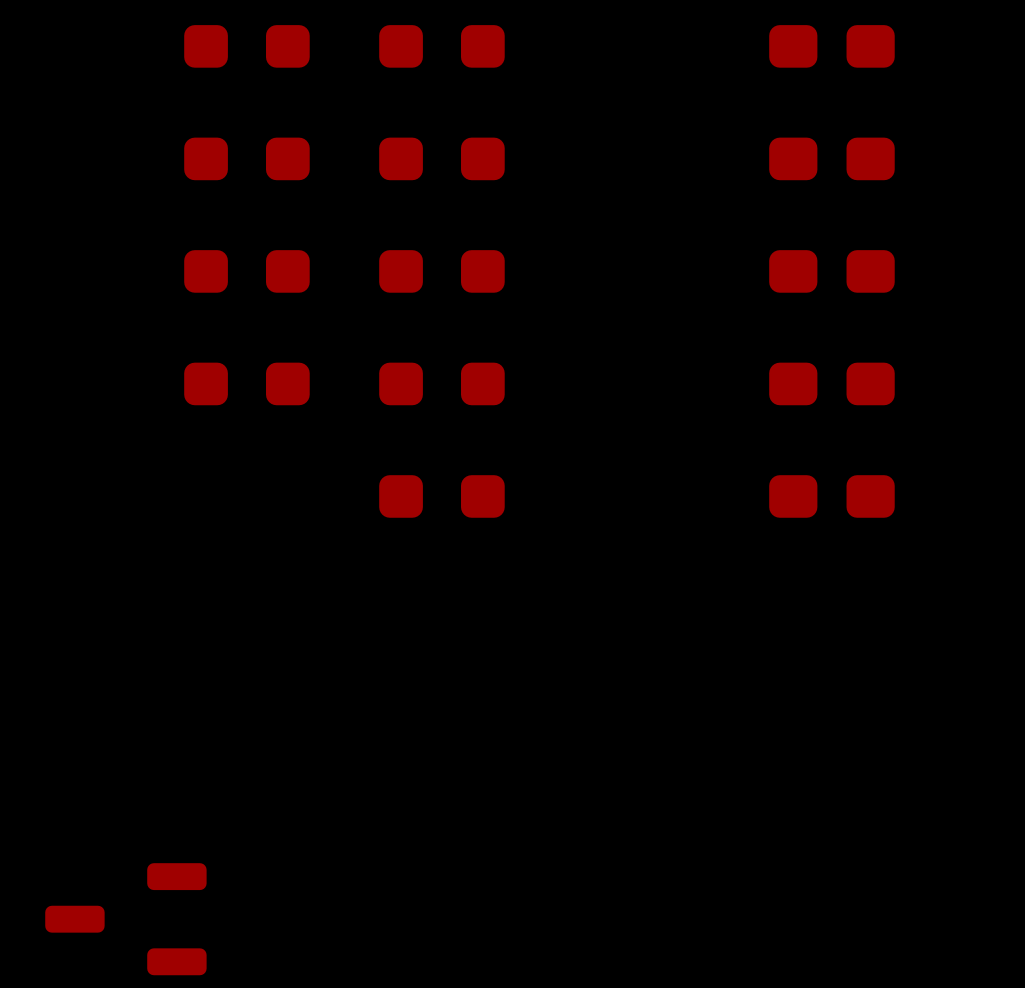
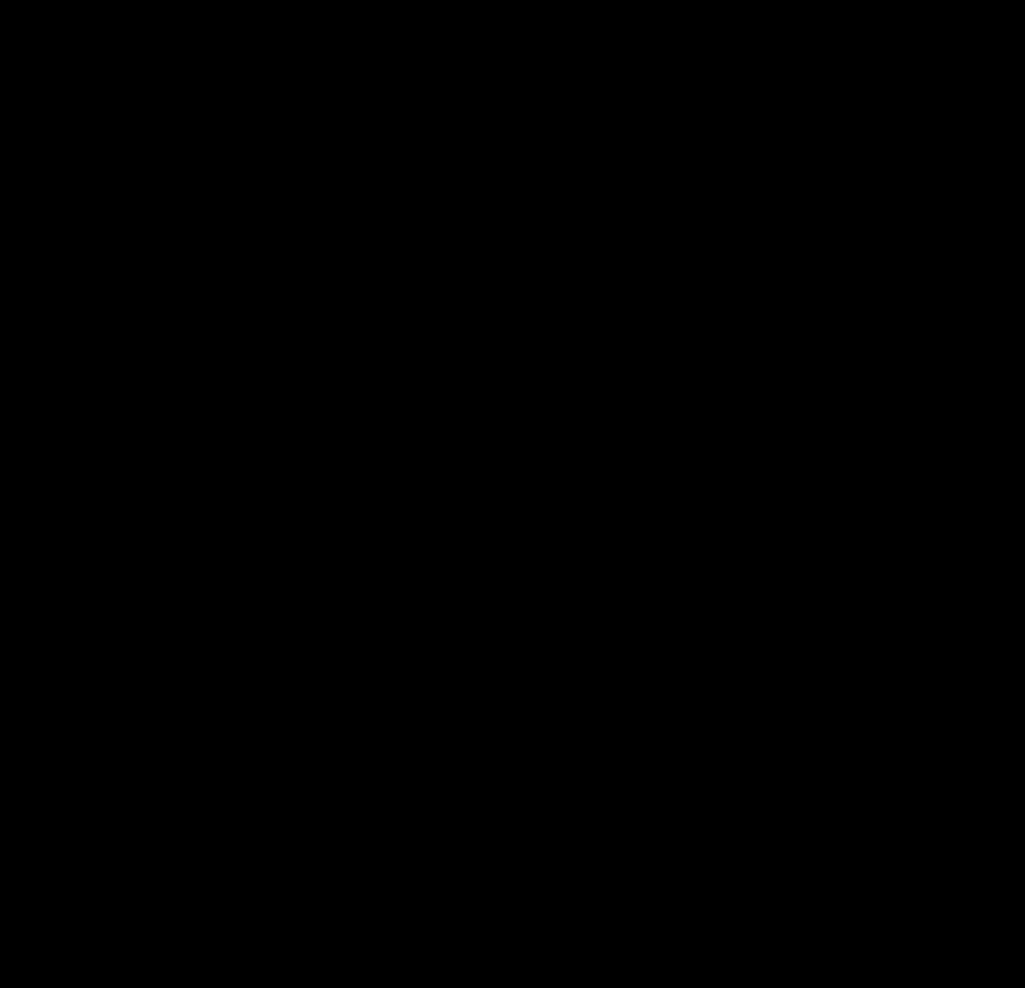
part: (246, 46) -> none
part: (441, 46) -> none
part: (831, 46) -> none
part: (246, 158) -> none
part: (441, 158) -> none
part: (831, 158) -> none
part: (246, 271) -> none
part: (441, 271) -> none
part: (831, 271) -> none
part: (246, 383) -> none
part: (441, 383) -> none
part: (831, 383) -> none
part: (441, 496) -> none
part: (831, 496) -> none
part: (125, 919) -> none

